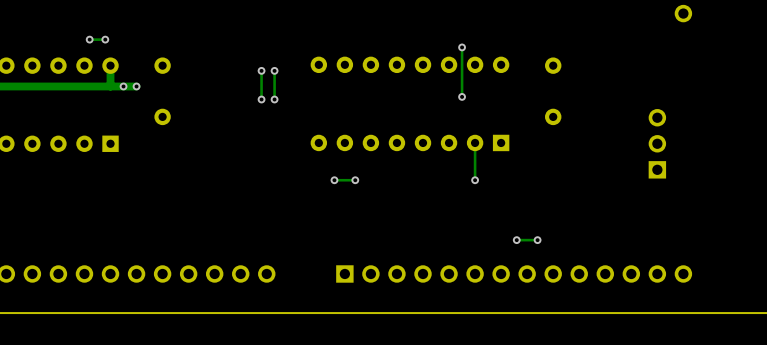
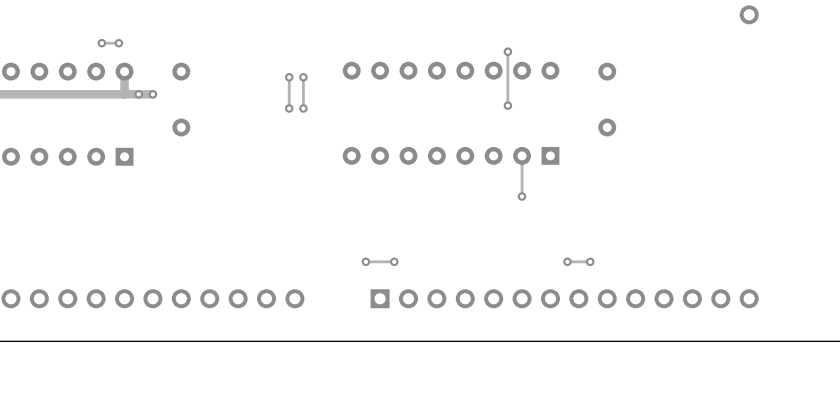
part: (657, 143) -> none
via: (334, 180) -> none
track: (355, 180) (334, 180) -> none
via: (355, 180) -> none
via: none -> (365, 261)
track: none -> (394, 261) (365, 261)
via: none -> (394, 261)

